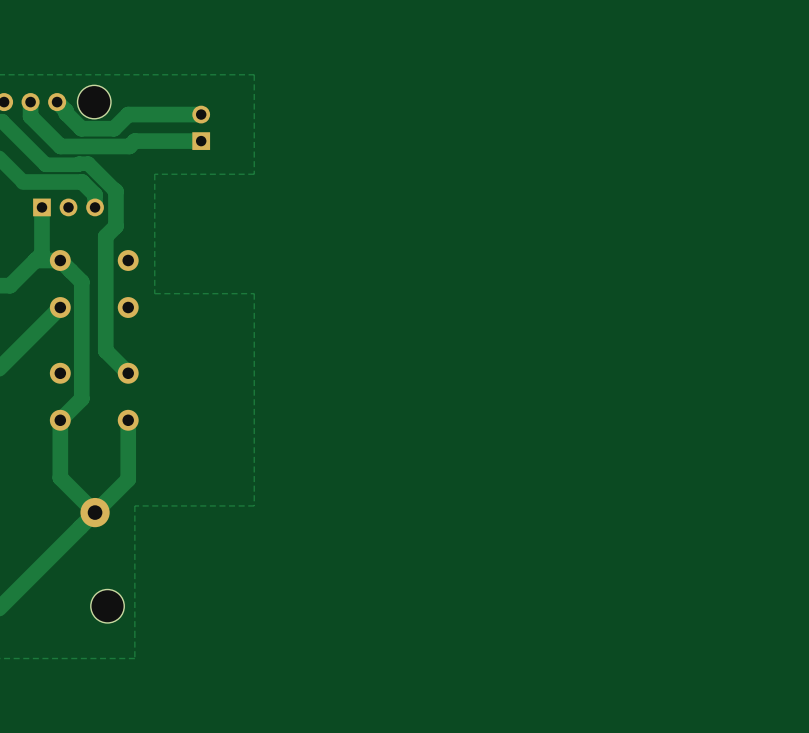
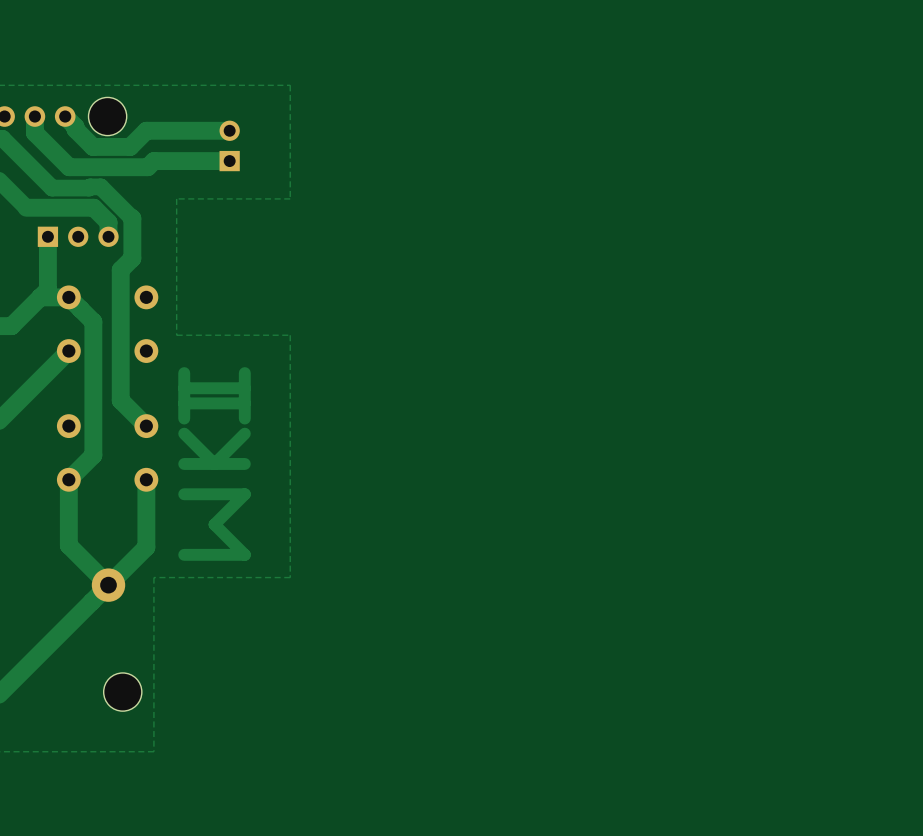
track: none -> (184, 373) (184, 418)
track: none -> (244, 373) (244, 418)
track: none -> (244, 388) (184, 388)
track: none -> (244, 403) (184, 403)
track: none -> (244, 433) (214, 463) (184, 433)
track: none -> (244, 463) (184, 463)
track: none -> (184, 494) (244, 494) (214, 524) (244, 554) (184, 554)

